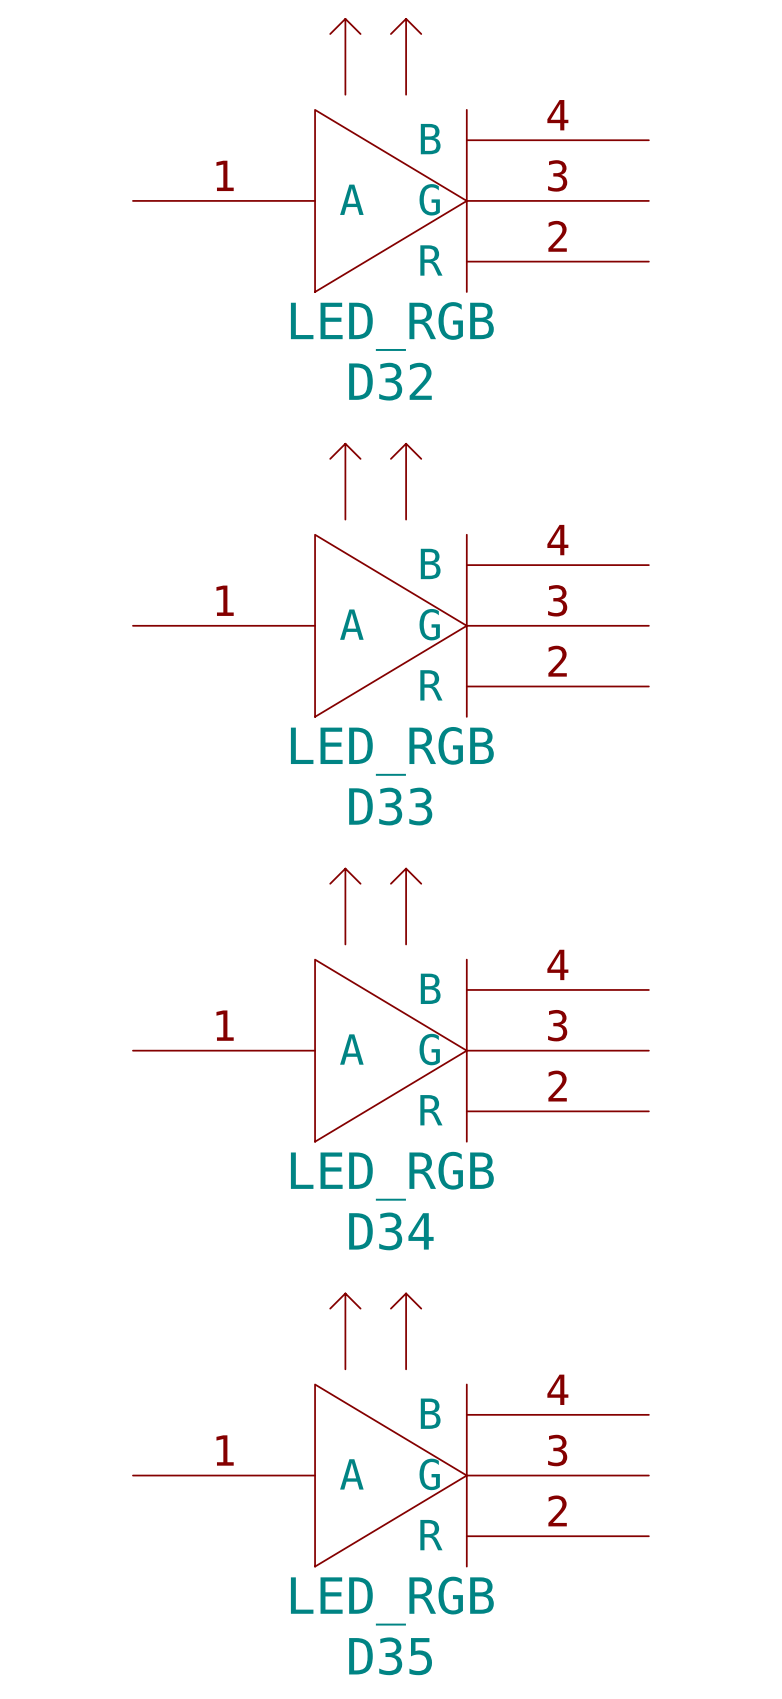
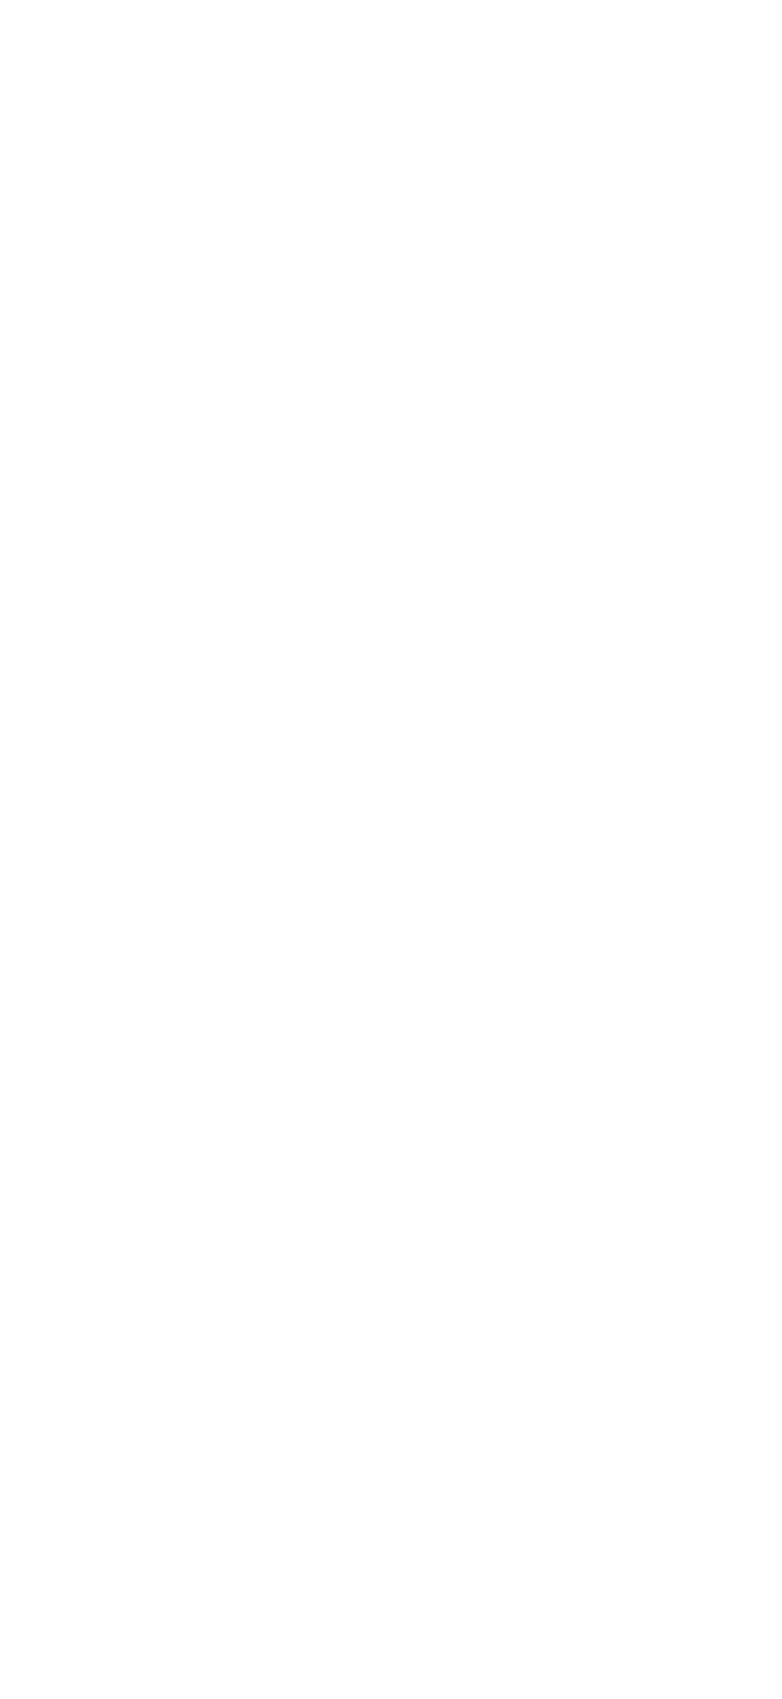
D32: LED_RGB (390, 155) -> none
D33: LED_RGB (390, 580) -> none
D34: LED_RGB (390, 1005) -> none
D35: LED_RGB (390, 1430) -> none

